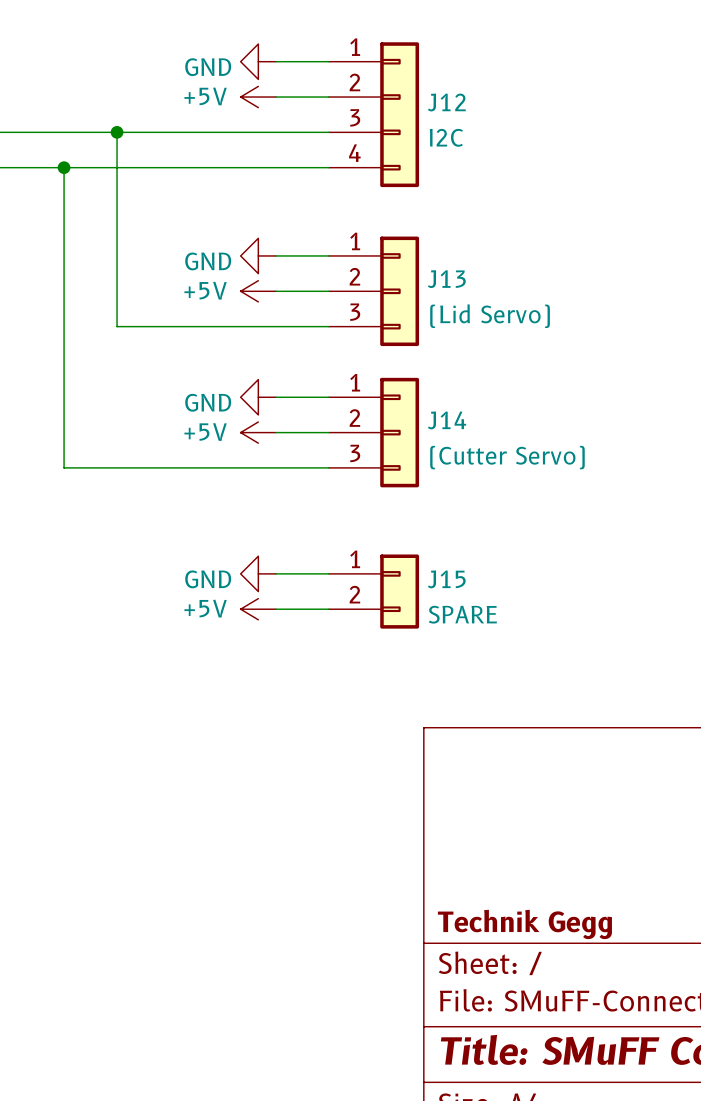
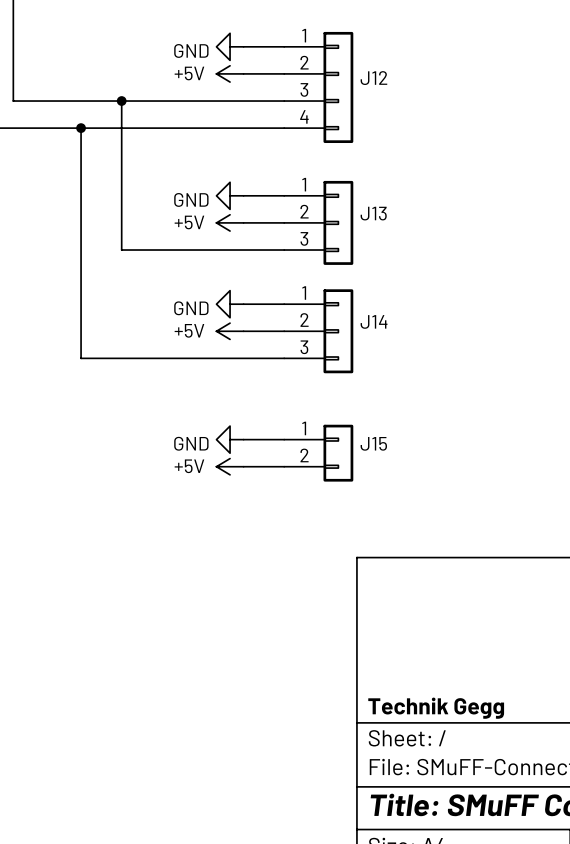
J12 value: I2C (446, 137) -> none
J13 value: (Lid Servo) (490, 316) -> none
J14 value: (Cutter Servo) (507, 457) -> none
J15 value: SPARE (462, 614) -> none

